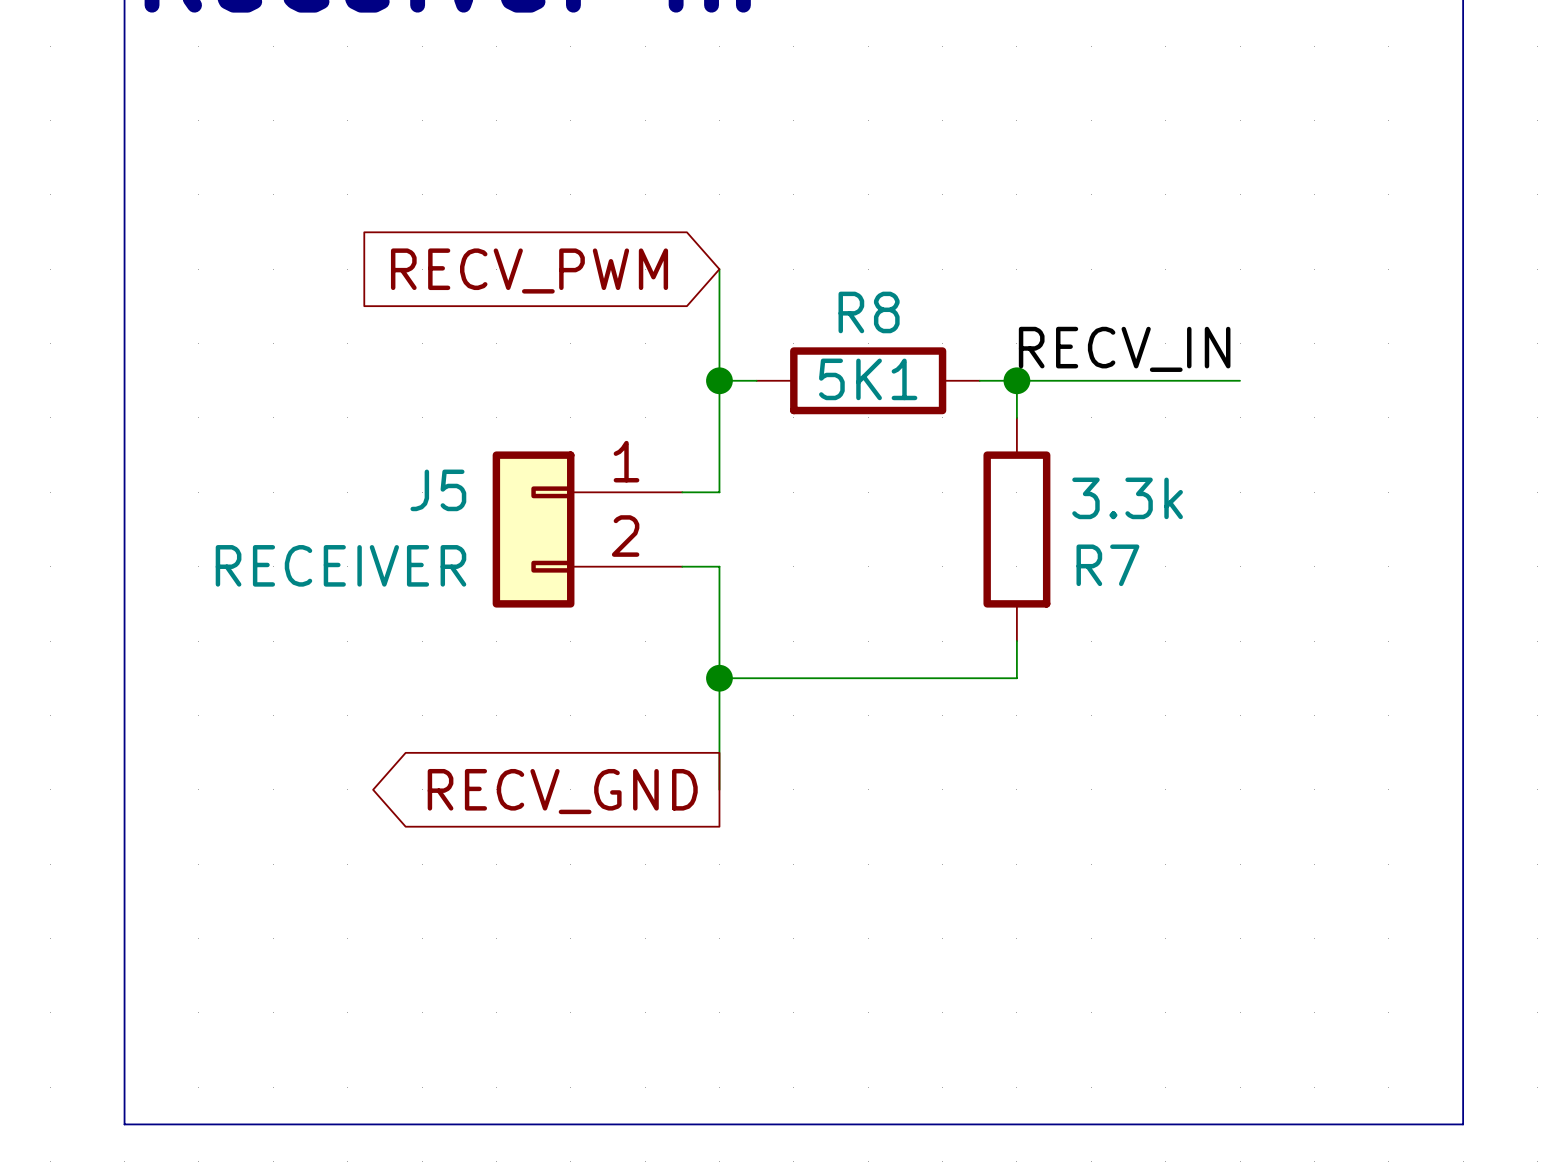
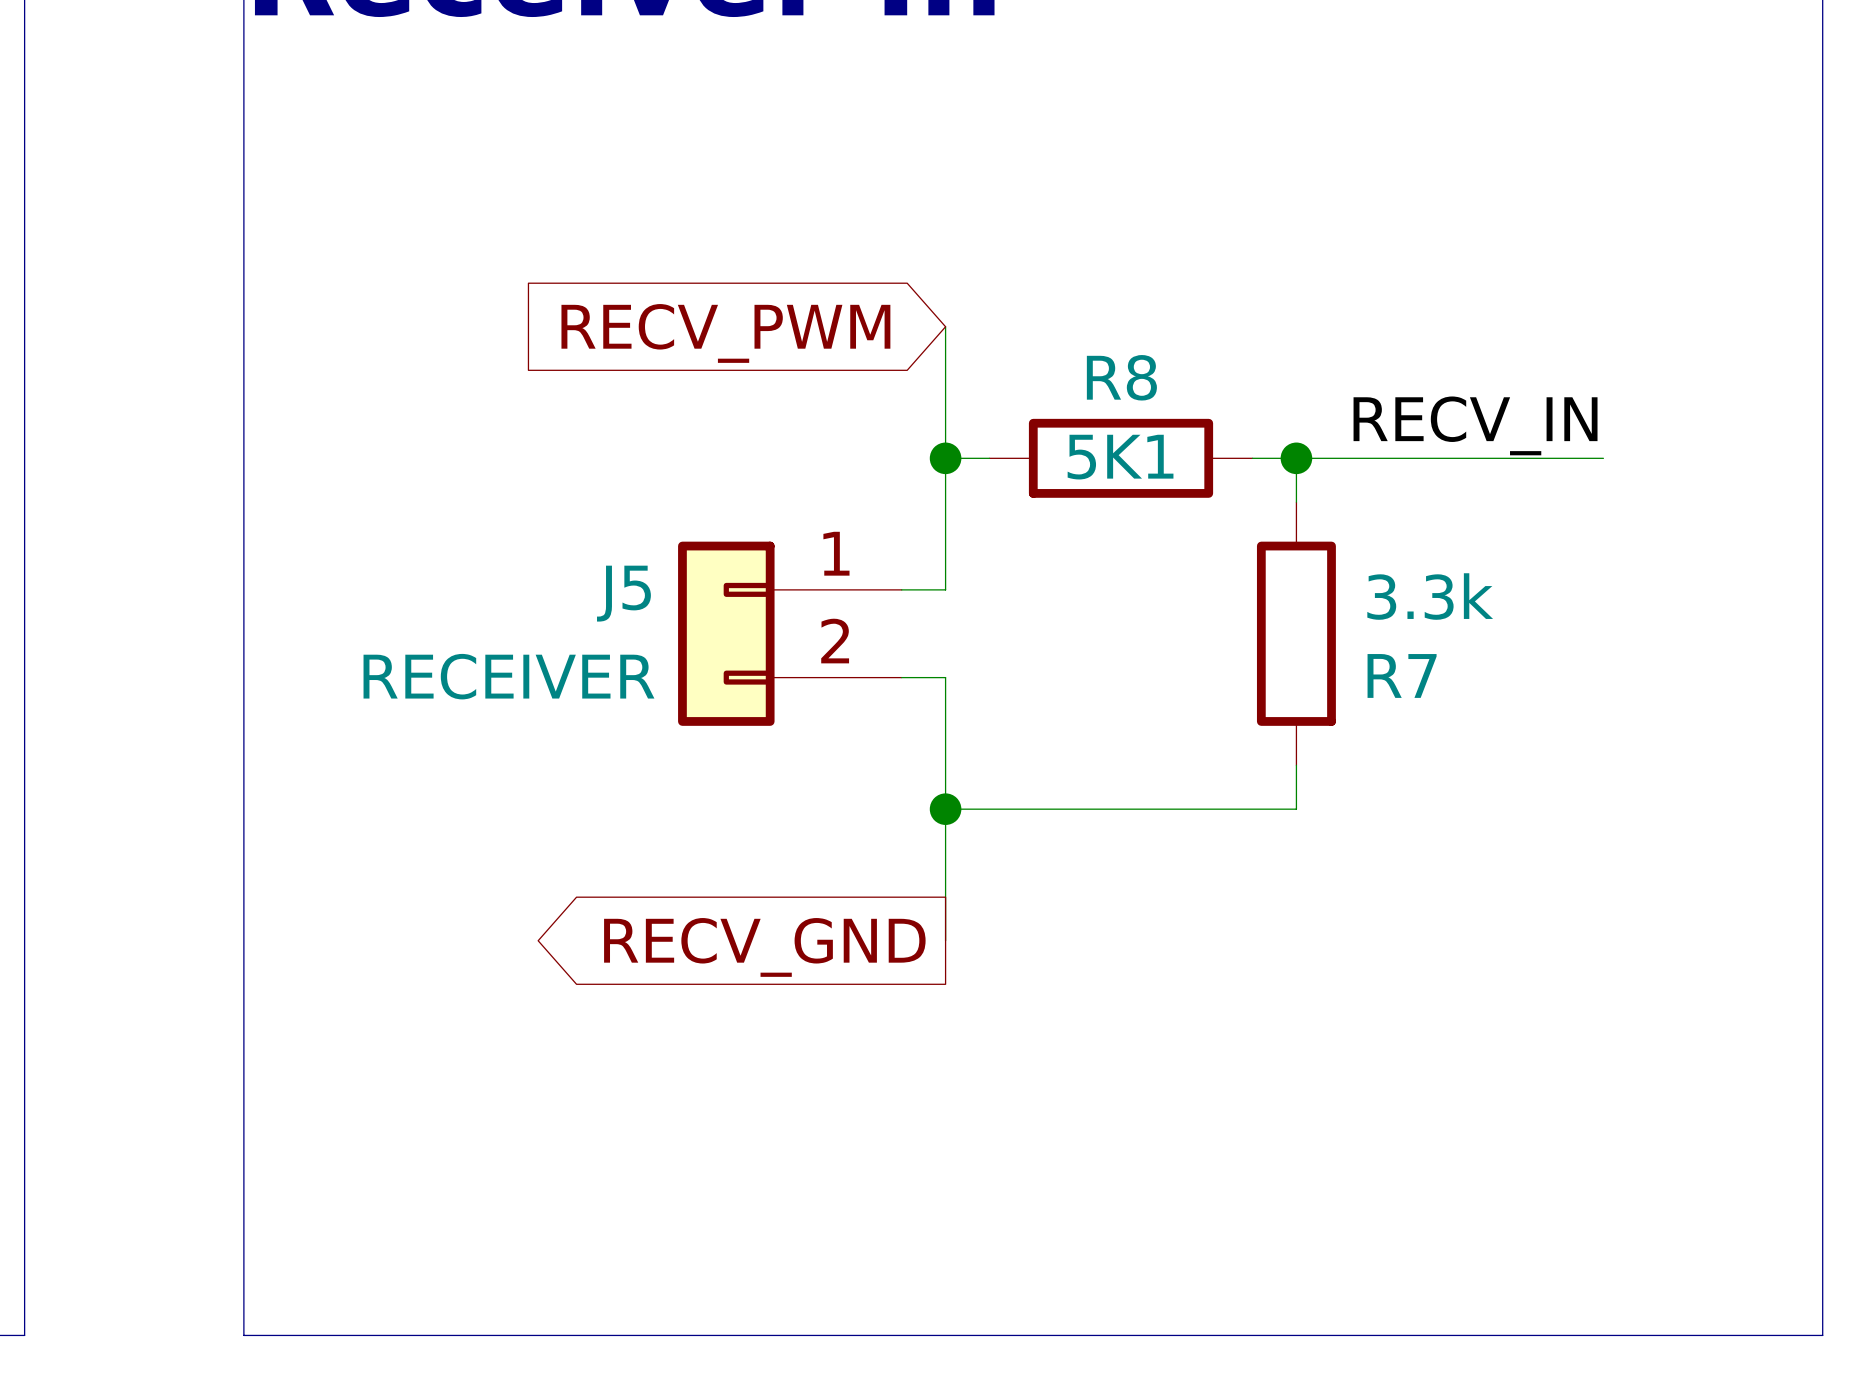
label position: RECV_IN (1124, 349) -> RECV_IN (1475, 425)
wire: none -> (1559, 458) (1603, 458)

